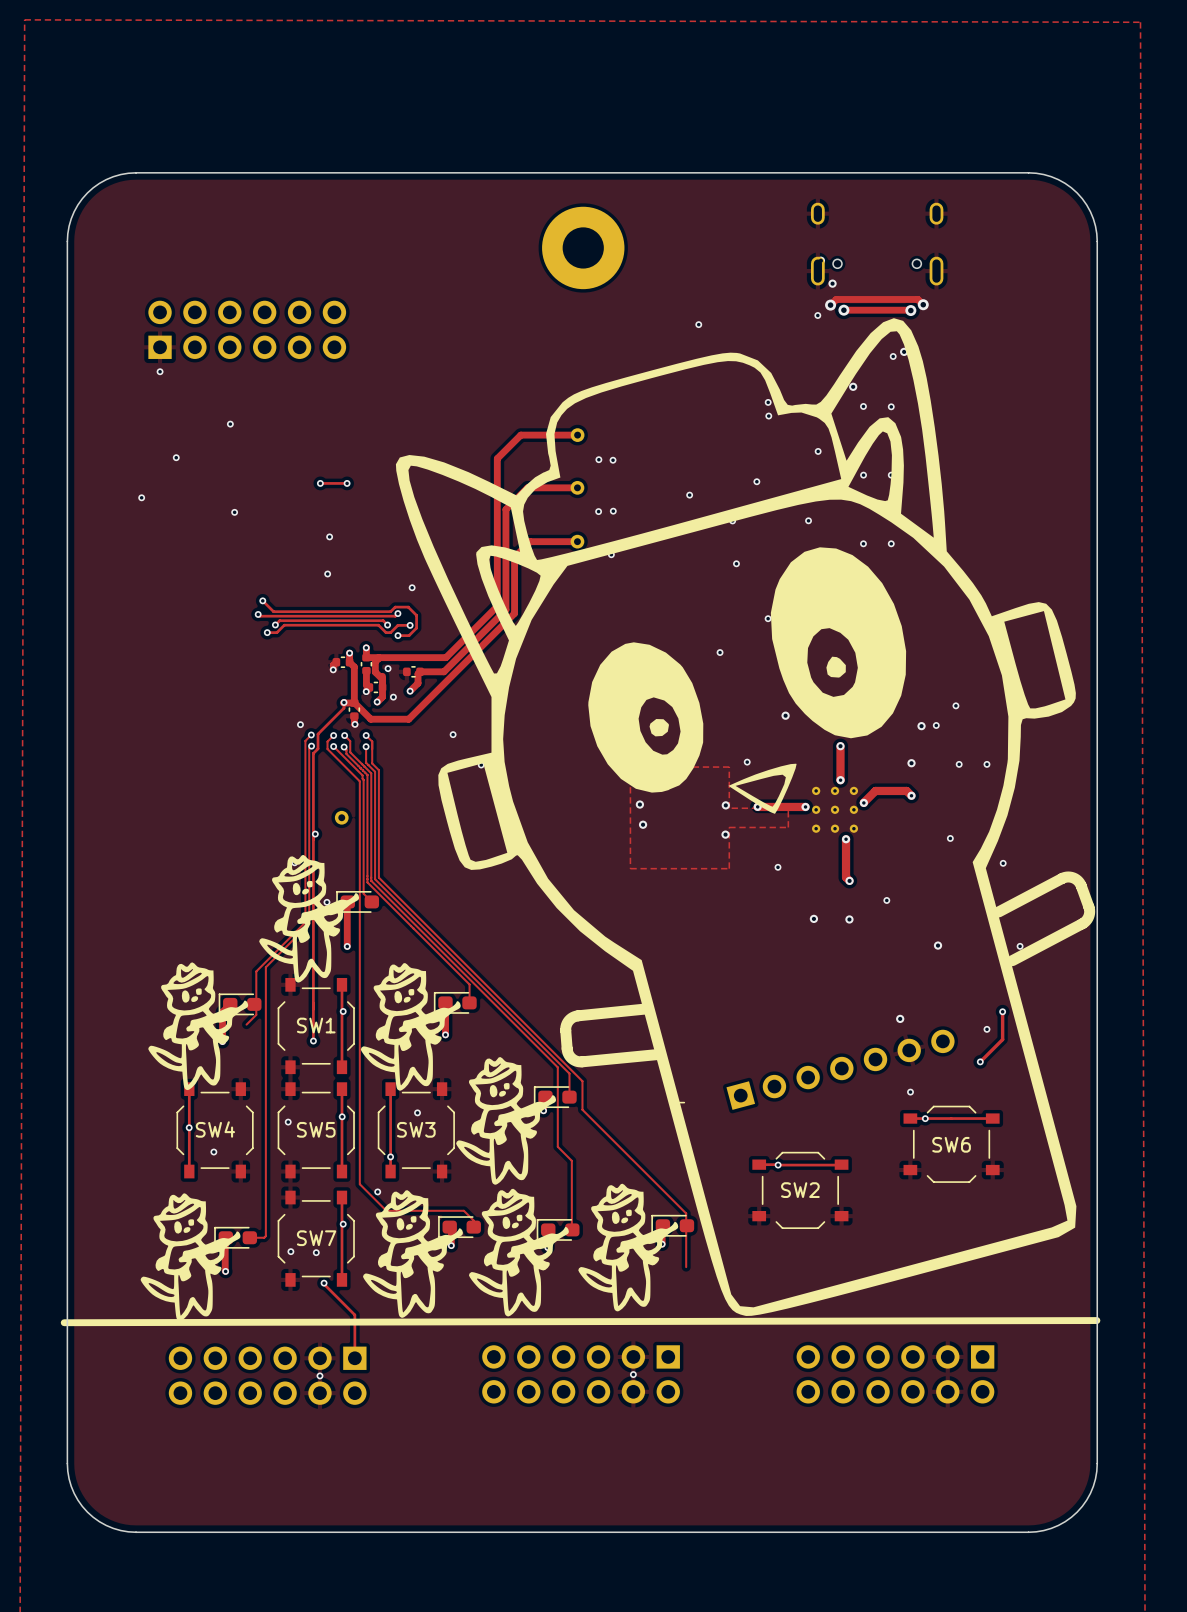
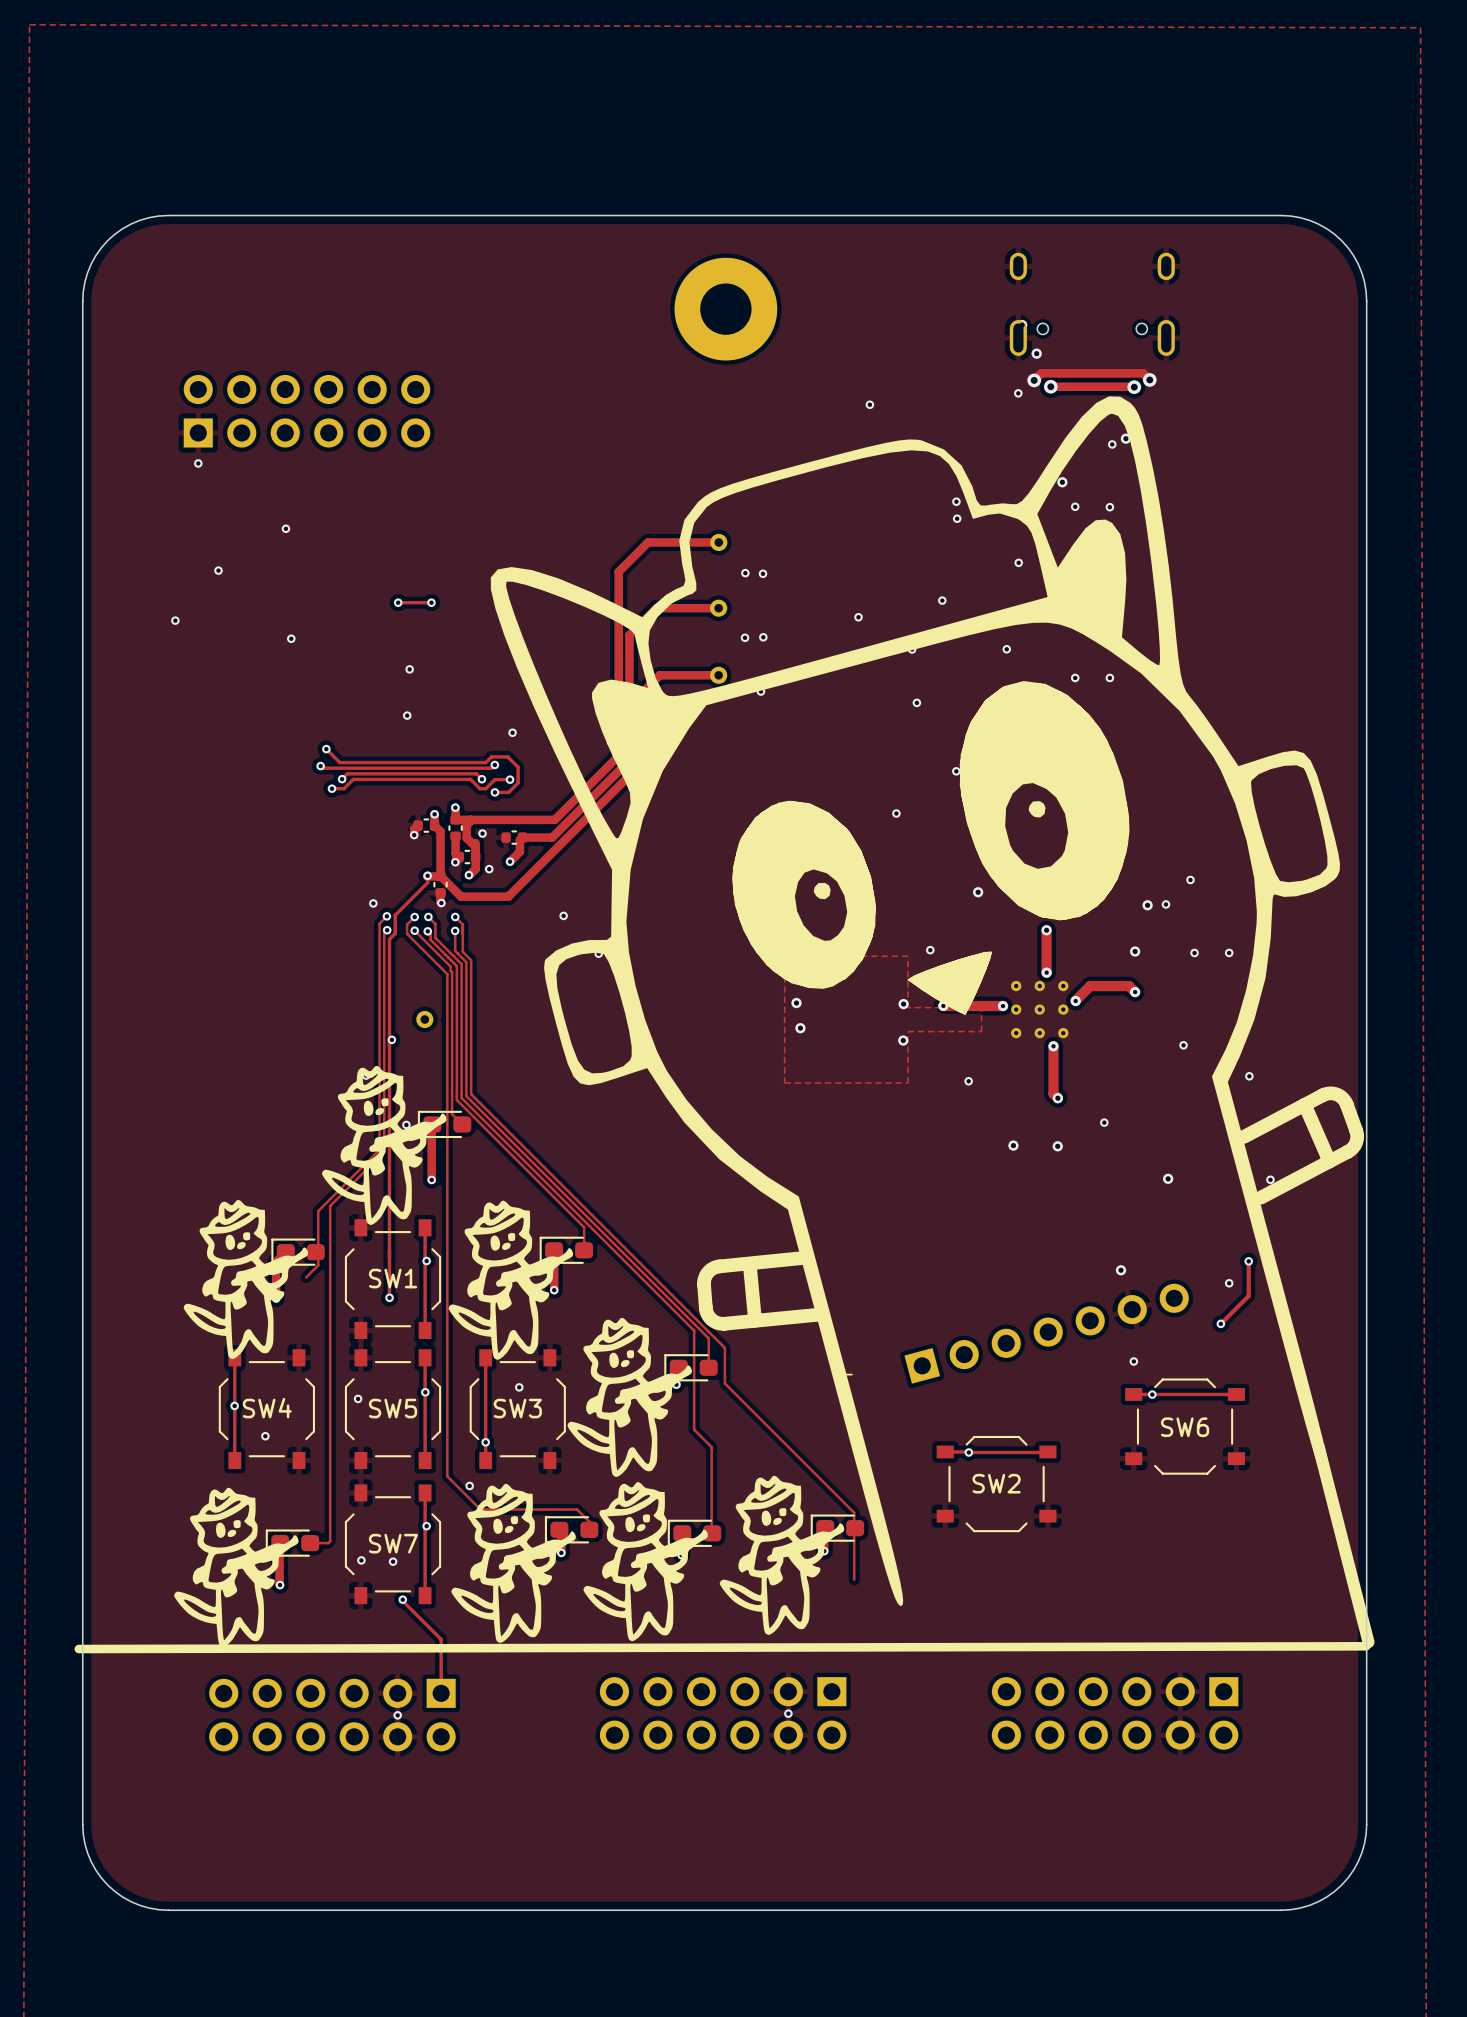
drawing: none -> [490, 396, 1341, 1607]
drawing: [395, 318, 1077, 1316] -> none
line: none -> (1304, 1104) (1329, 1161)
line: none -> (749, 1263) (755, 1320)
line: none -> (1318, 1446) (1368, 1642)

